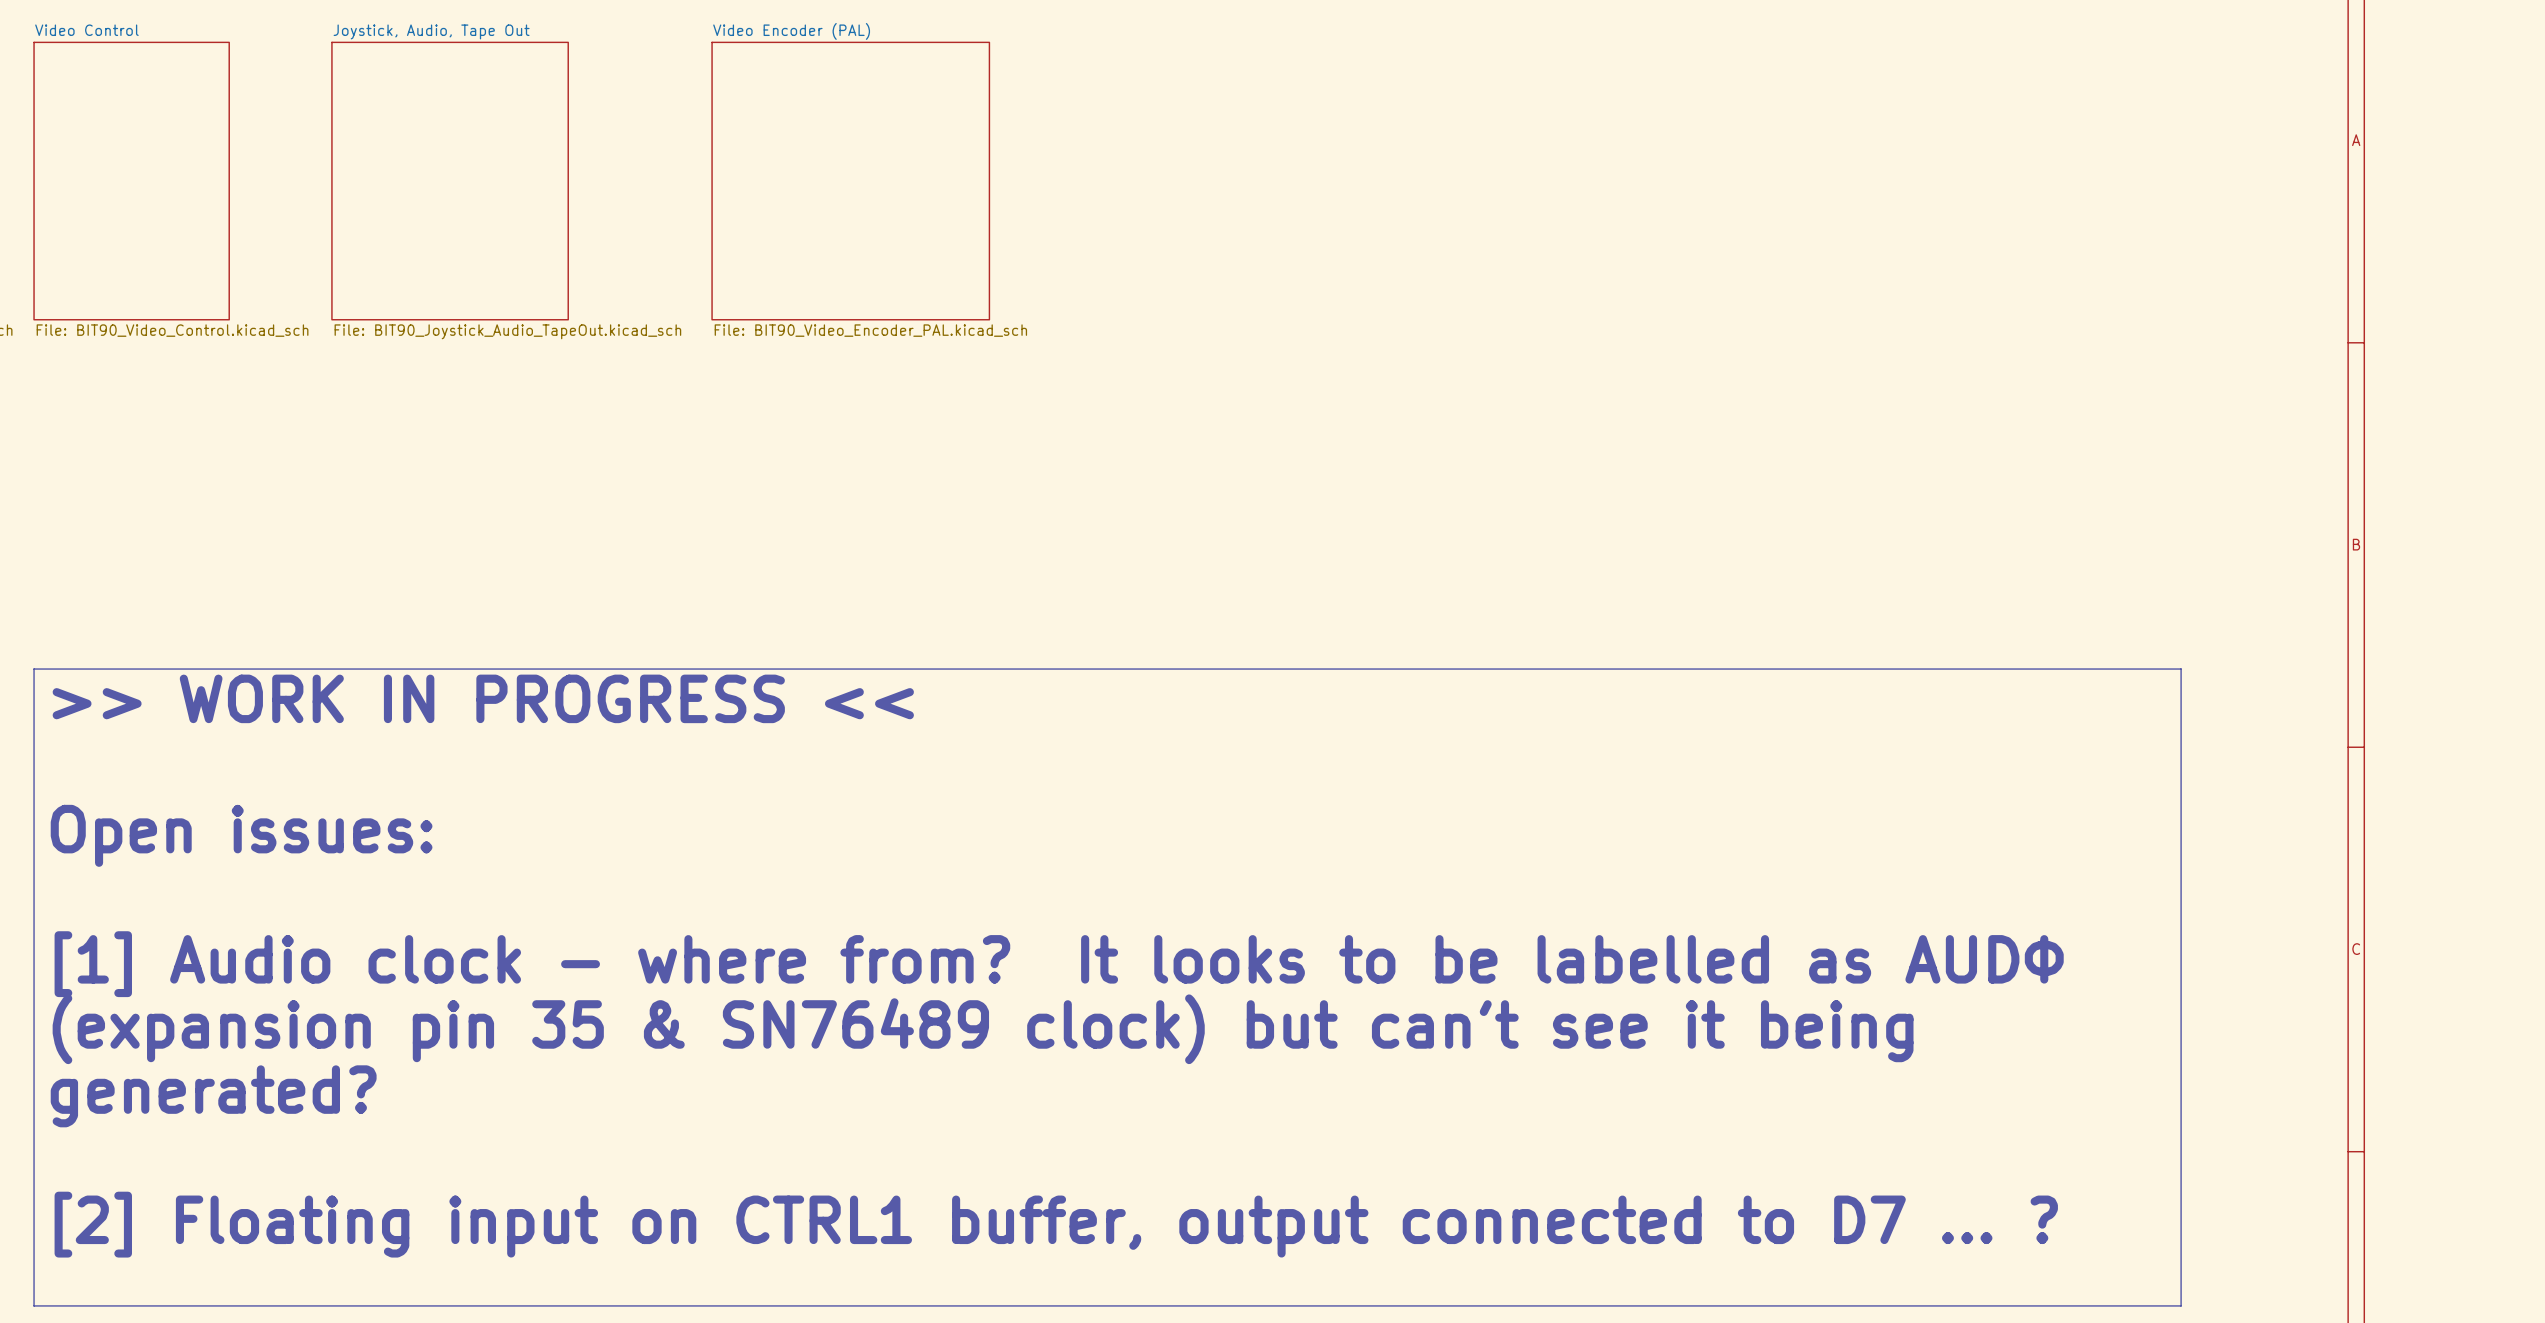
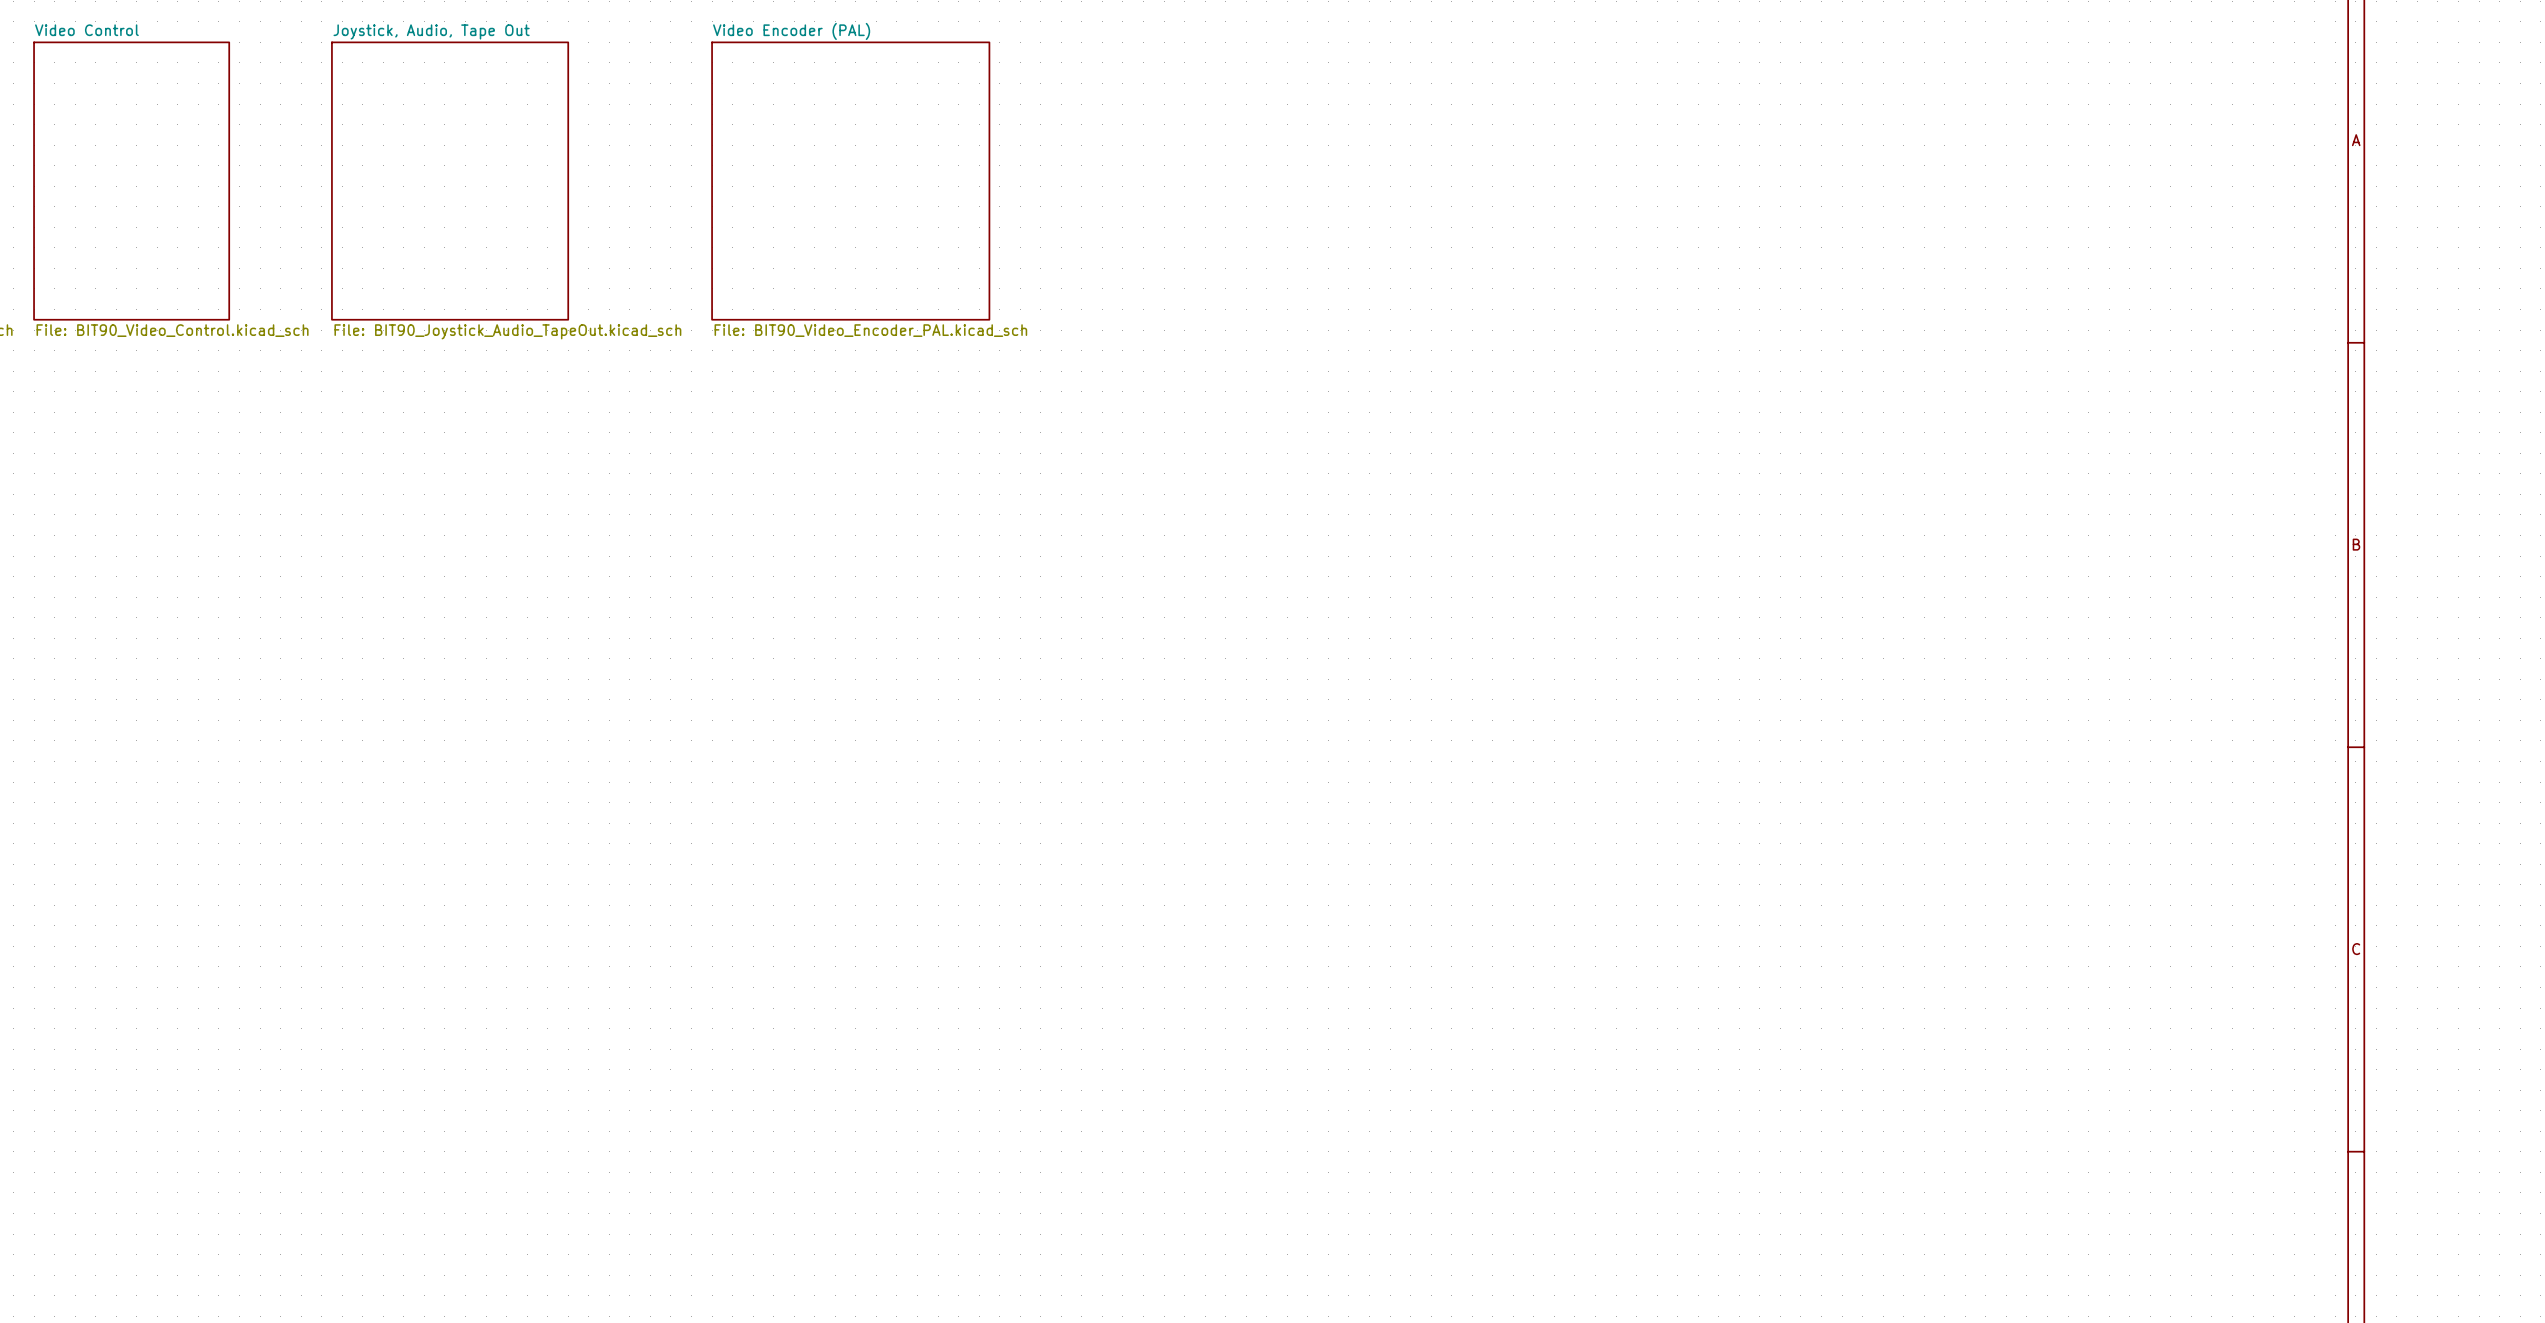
line: (34, 669) (2181, 669) (2181, 1305) (34, 1305) (34, 669) -> none
text: >> WORK IN PROGRESS << (483, 698) -> none
text: Open issues: (241, 835) -> none
text: [1] Audio clock - where from? It looks to be labelled as AUDΦ (1059, 964) -> none
text: (expansion pin 35 & SN76489 clock) but can't see it being (983, 1029) -> none
text: generated? (213, 1096) -> none
text: [2] Floating input on CTRL1 buffer, output connected to D7 ... ? (1056, 1224) -> none

